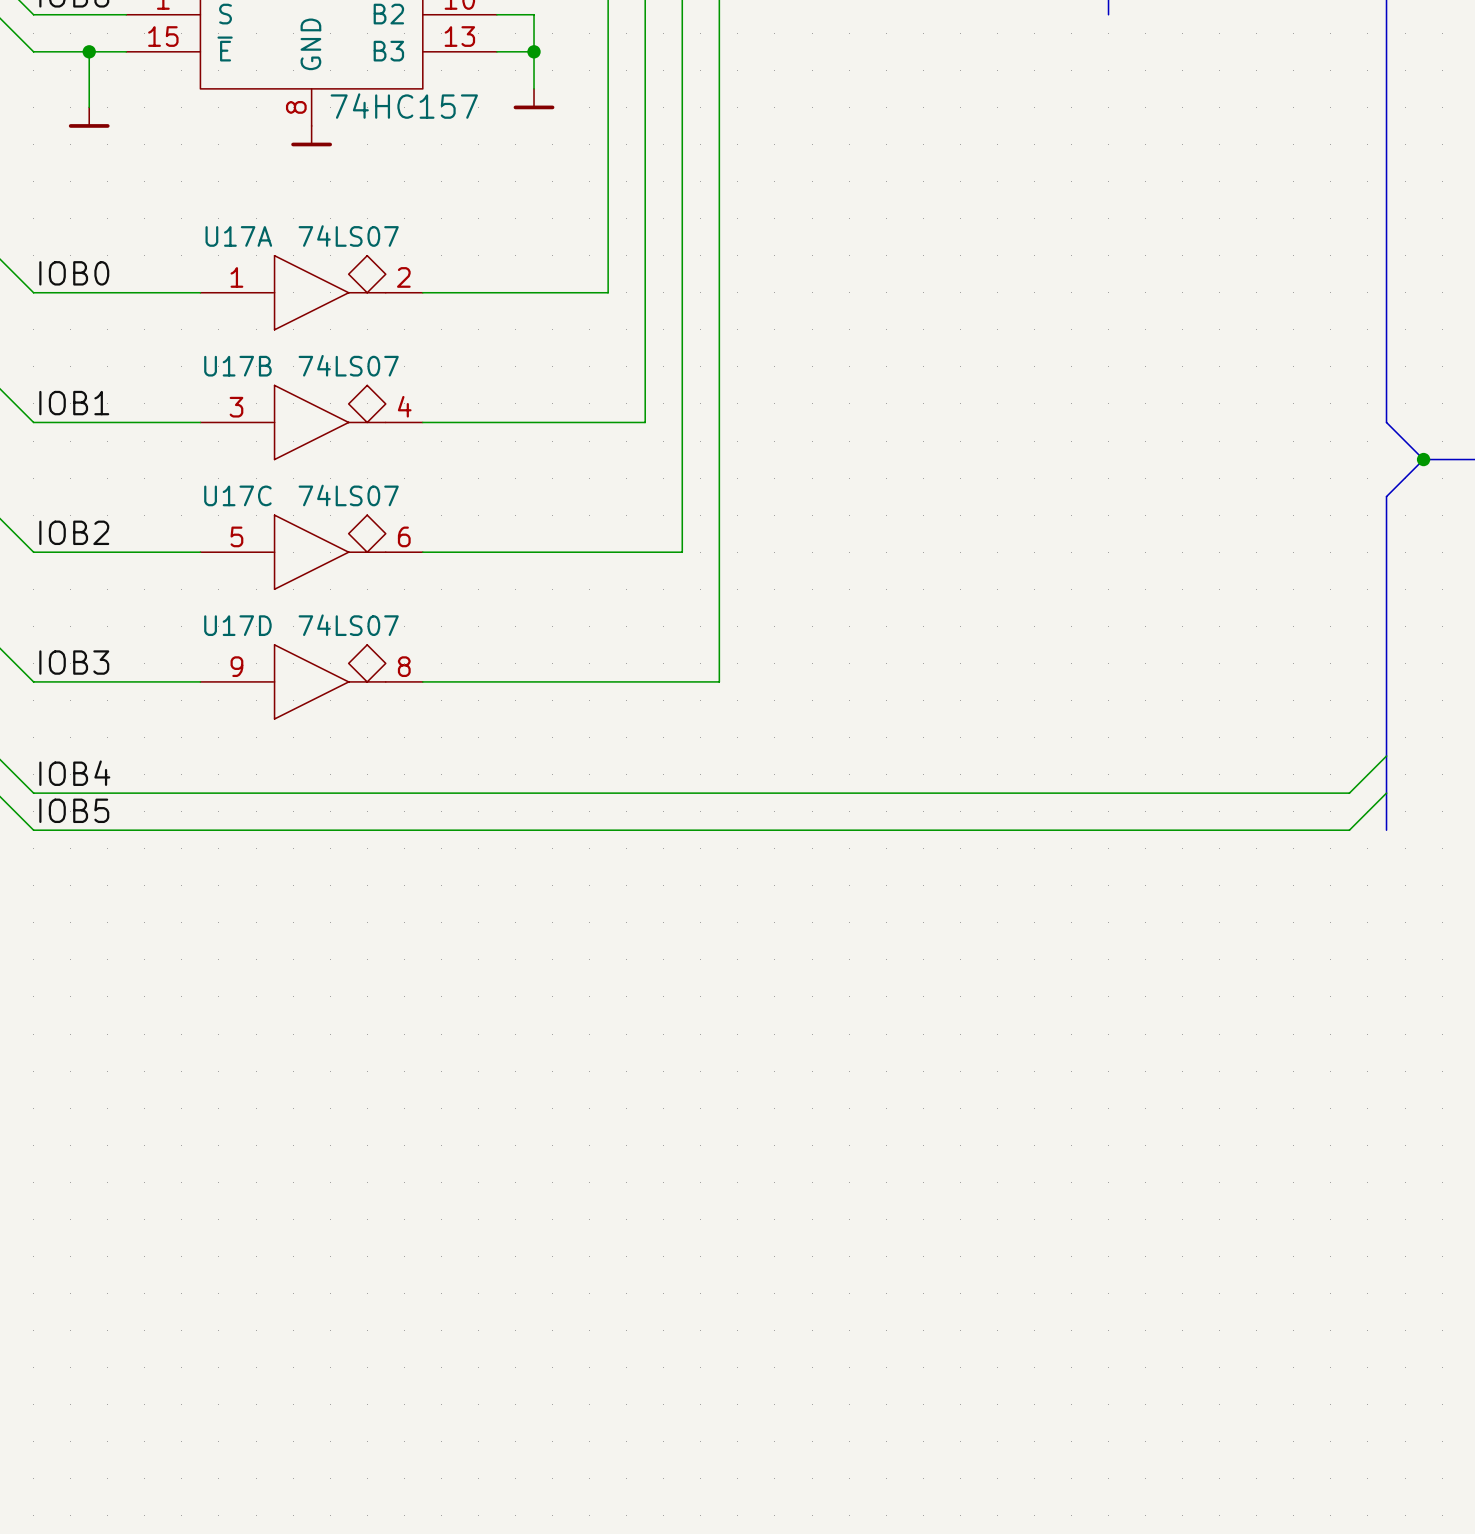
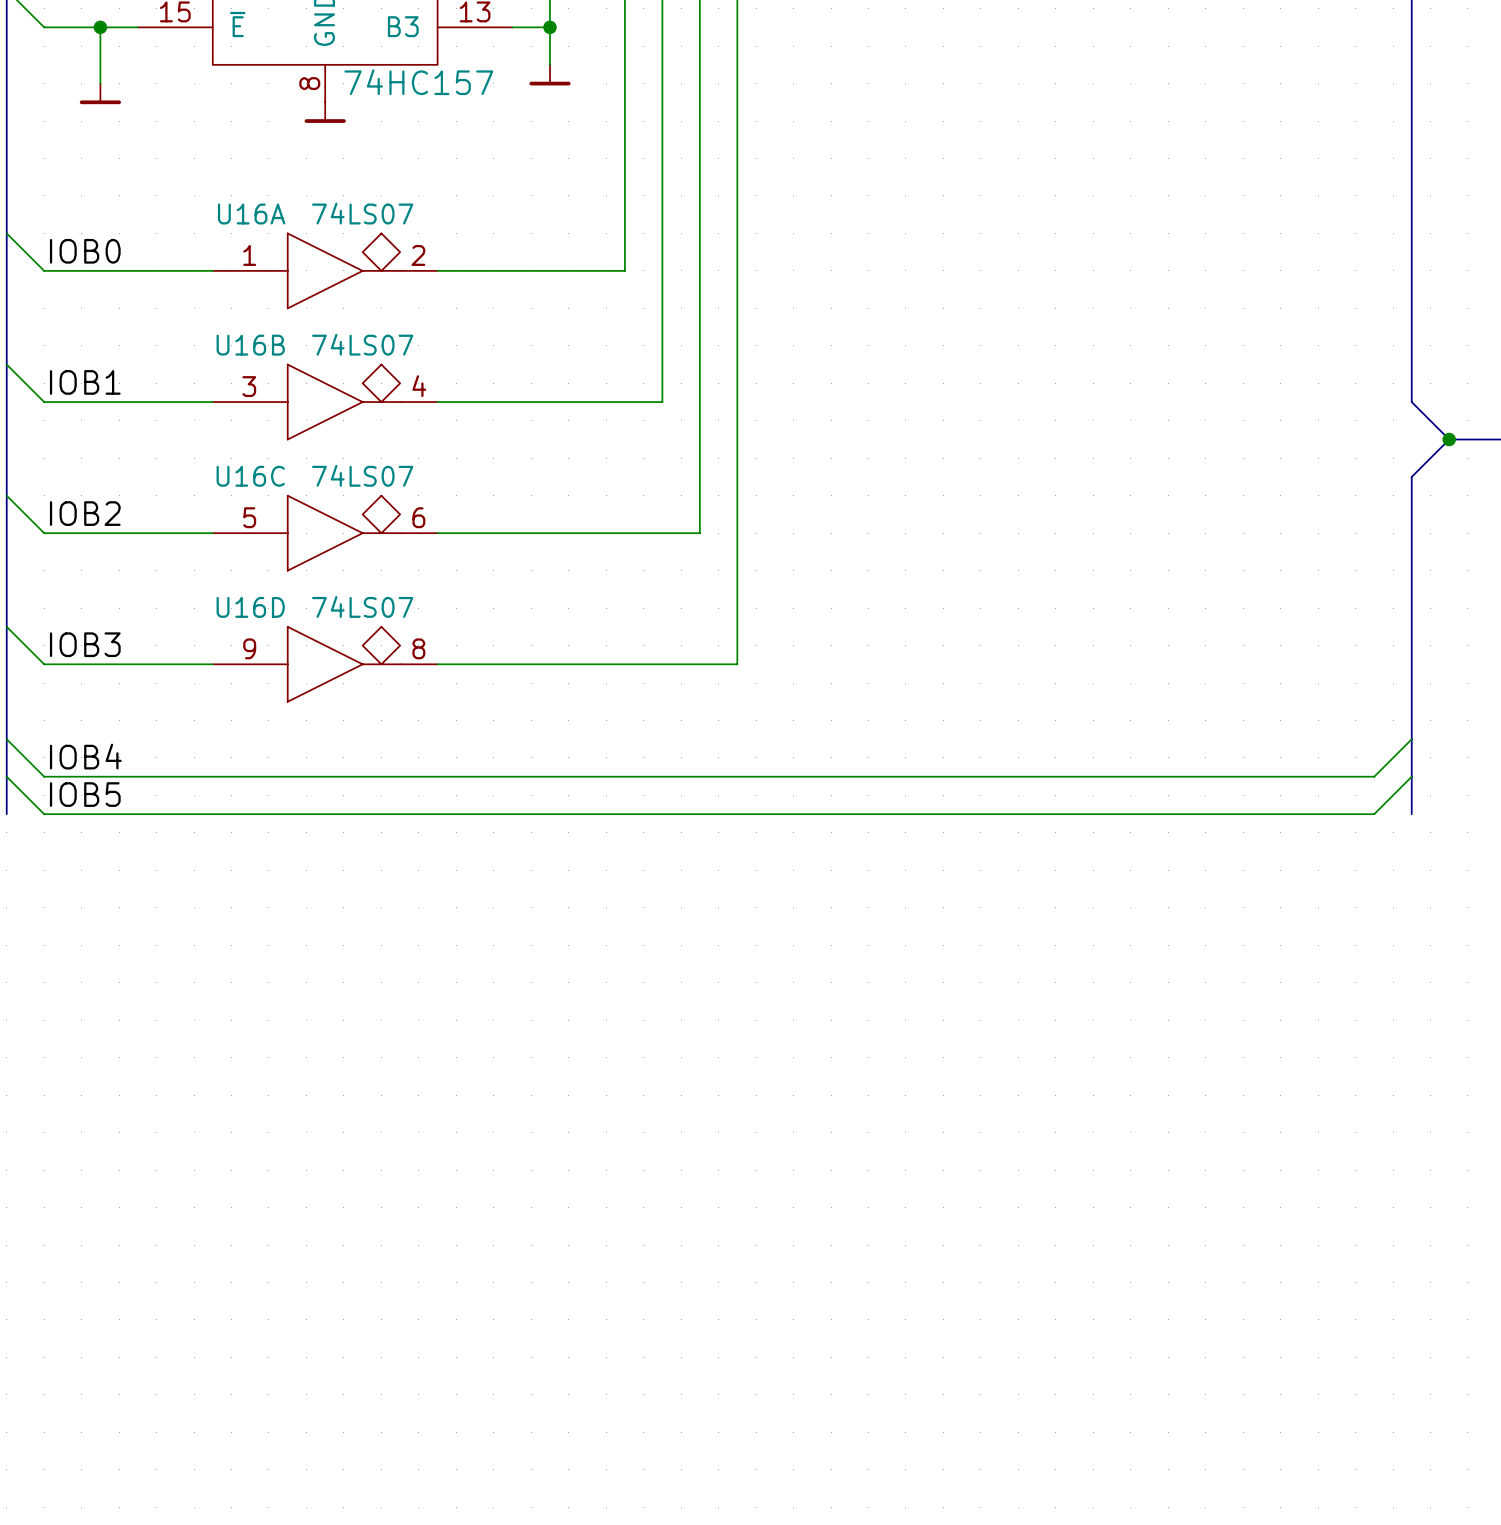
U17A name: U17A (238, 236) -> U16A (251, 214)
U17B name: U17B (237, 366) -> U16B (250, 345)
U17C name: U17C (237, 495) -> U16C (250, 476)
U17D name: U17D (237, 625) -> U16D (250, 607)

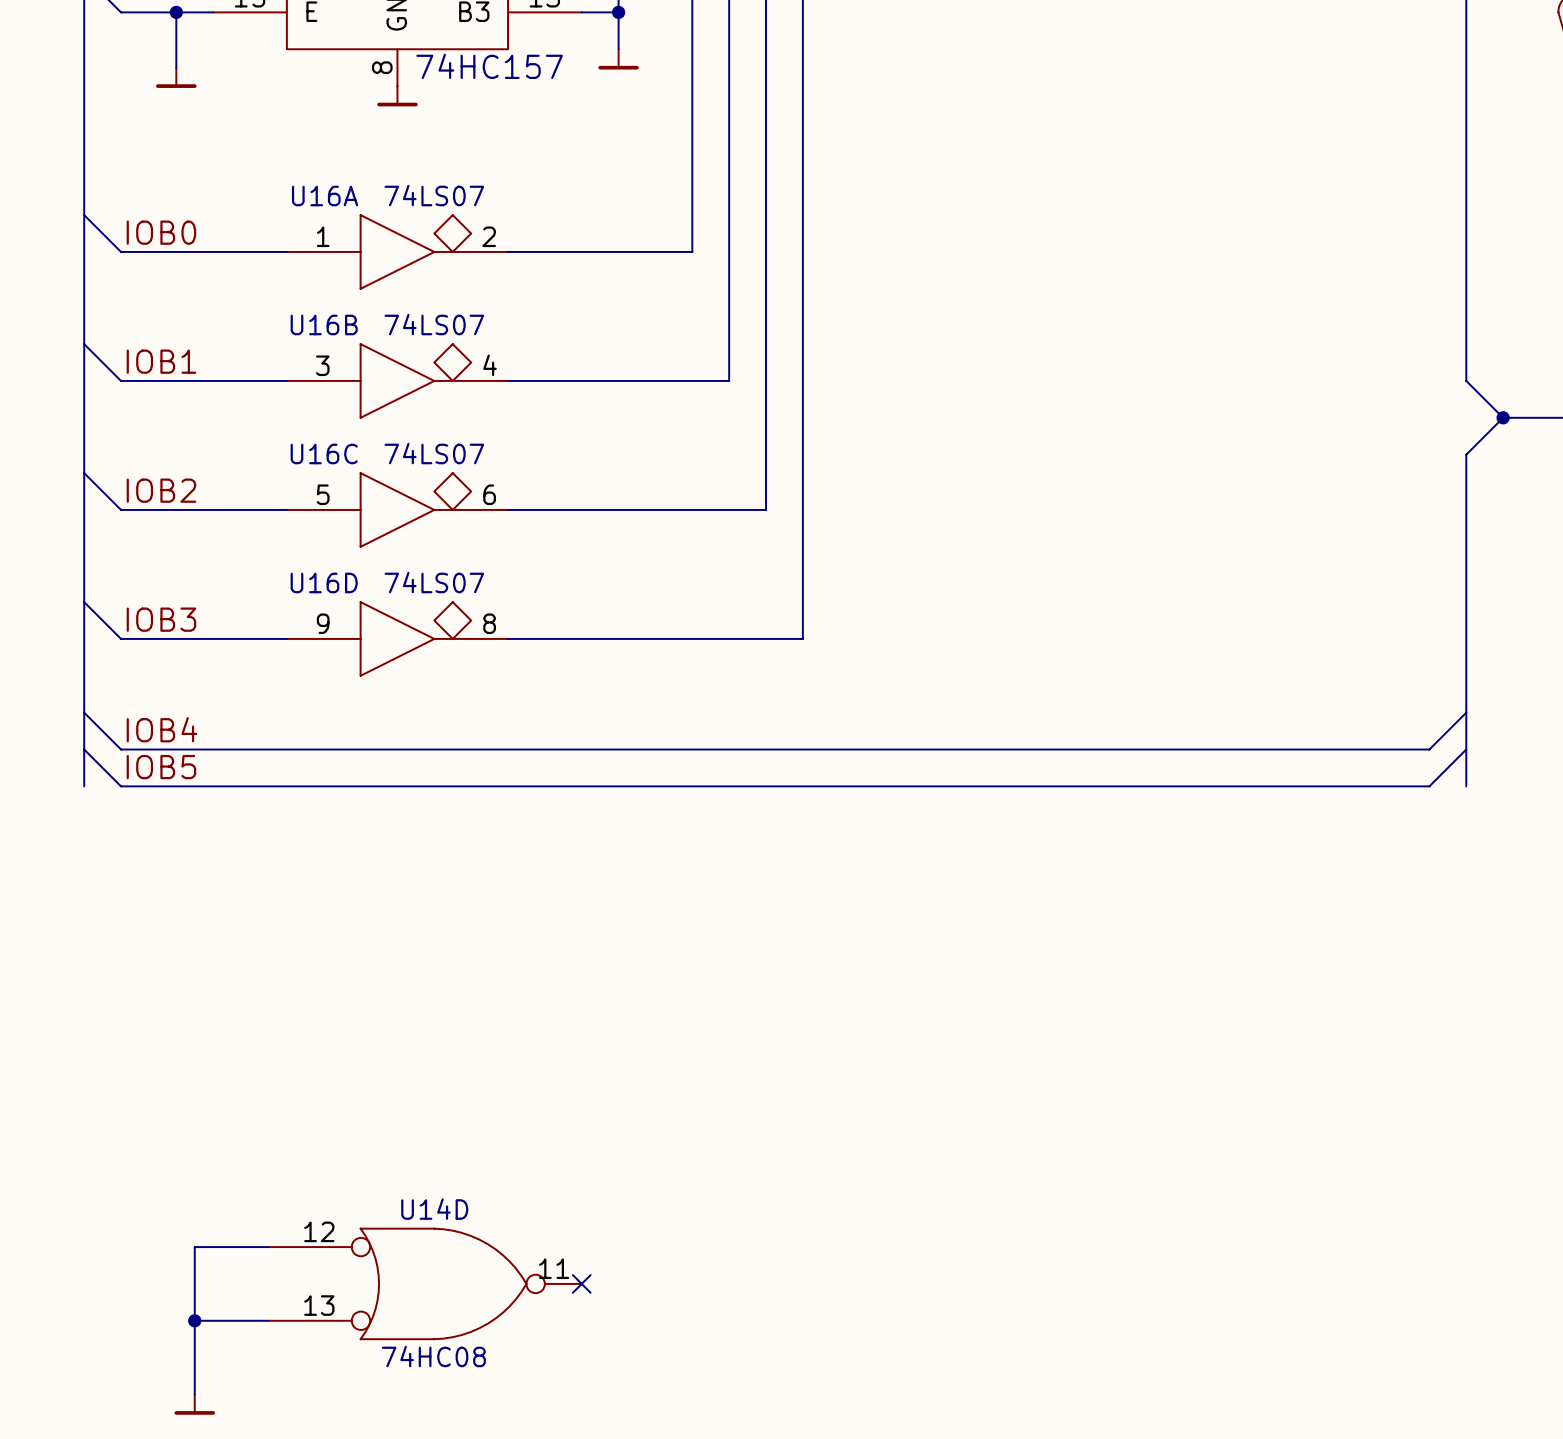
wire: none -> (268, 1247) (194, 1247) (194, 1394)
U14D: none -> 74HC08 (425, 1283)
no-connect mark: none -> (581, 1283)
wire: none -> (194, 1320) (268, 1320)
junction: none -> (194, 1320)
power symbol: none -> (194, 1404)

